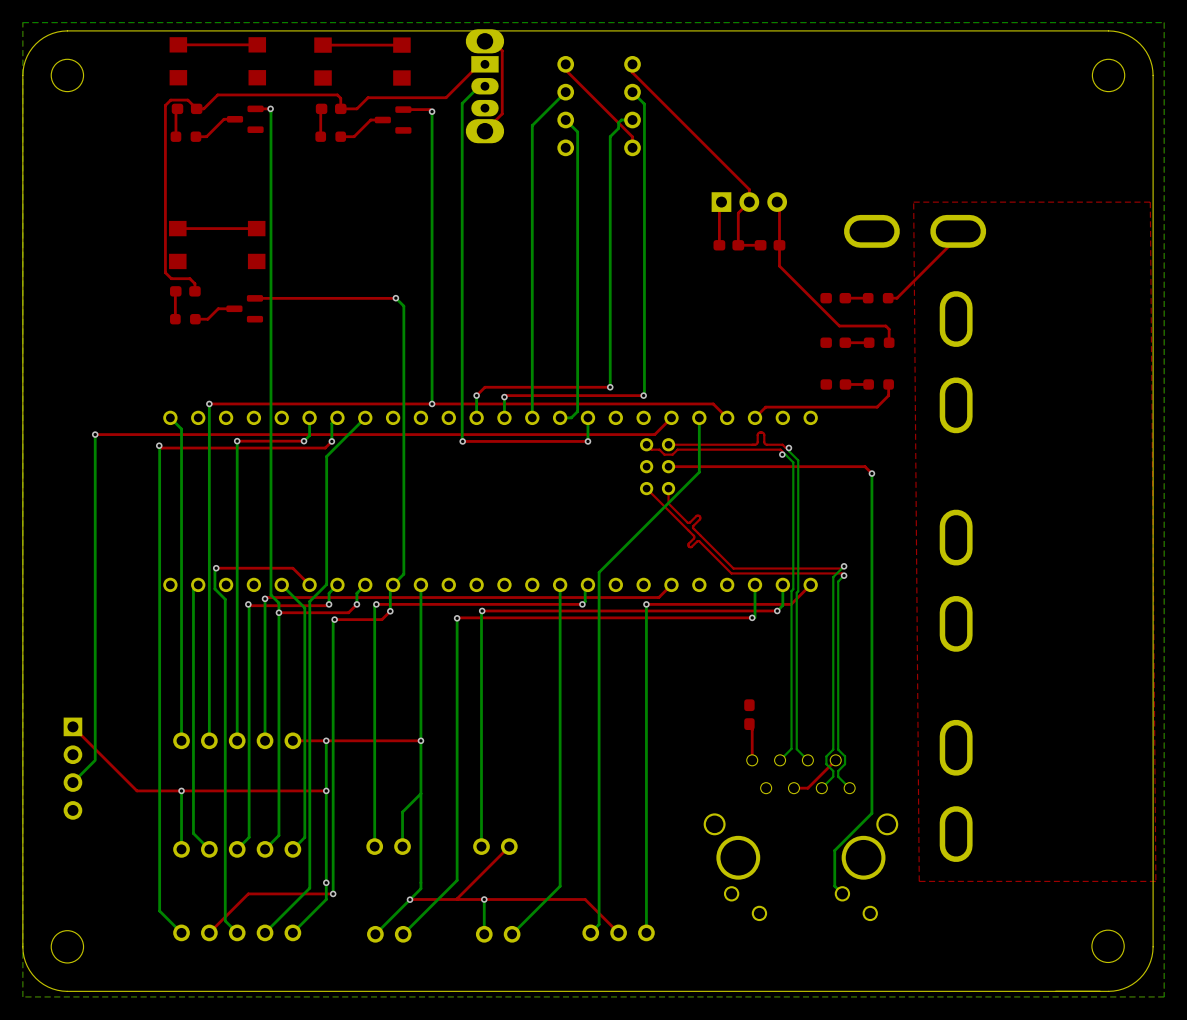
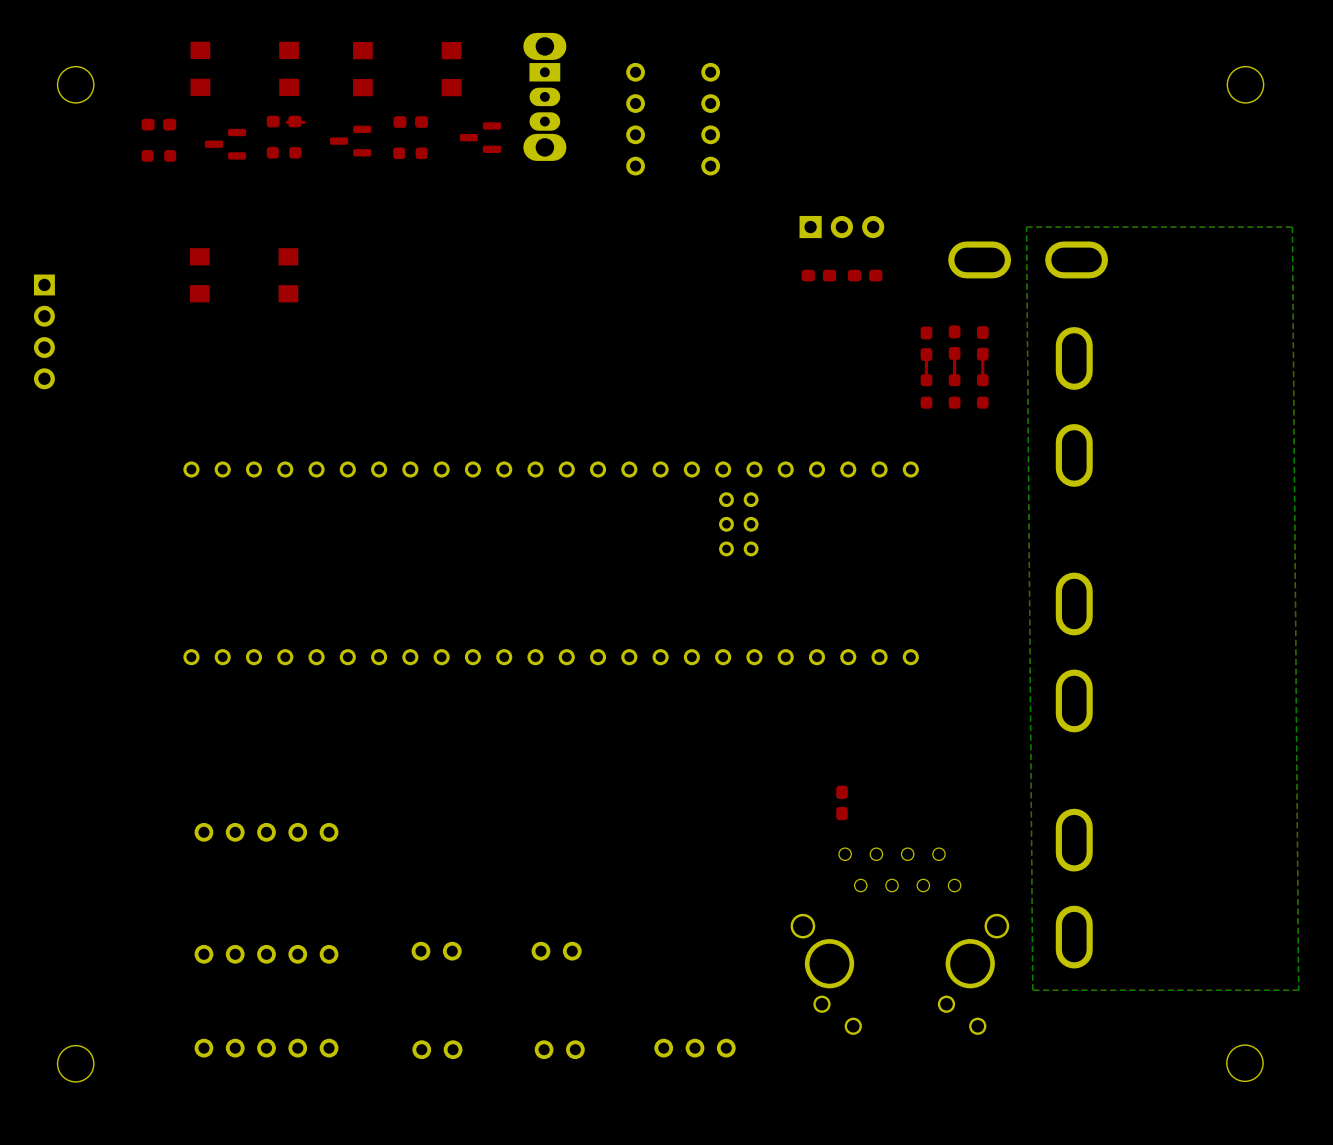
bottom zone outline: (1164, 22) (22, 22) (22, 996) (1164, 996) (1164, 22) -> none
board edge: (1108, 30) (67, 30) (52, 33) (39, 40) (27, 56) (22, 75) (22, 946) (25, 961) (32, 974) (48, 986) (67, 991) (1108, 991) (1123, 988) (1136, 981) (1148, 966) (1153, 946) (1153, 75) (1148, 56) (1140, 43) (1123, 33) (1108, 30) -> none
top track: (484, 41) (492, 41) (502, 50) (502, 113) (484, 131) -> none
top track: (257, 44) (178, 44) -> none
top track: (401, 45) (323, 45) -> none
top track: (484, 64) (479, 64) (446, 97) (368, 97) (356, 108) (340, 108) (340, 98) (337, 94) (217, 94) (203, 108) (196, 108) (187, 100) (170, 100) (165, 105) (165, 272) (171, 278) (189, 278) (194, 283) (194, 291) -> none
top track: (565, 64) (565, 70) (632, 136) (632, 147) -> none
top track: (632, 64) (632, 72) (749, 189) (749, 202) (738, 213) (738, 245) (760, 245) -> none
bottom track: (484, 86) (479, 86) (462, 103) (462, 441) -> none
bottom track: (565, 92) (532, 125) (532, 417) -> none
bottom track: (632, 92) (644, 104) (643, 395) -> none
top track: (177, 108) (175, 136) -> none
part: (187, 108) -> none
part: none -> (283, 121)
via: (270, 108) -> none
top track: (321, 108) (320, 136) -> none
part position: (331, 108) -> (410, 122)
top track: (403, 109) (430, 109) (432, 111) -> none
part: none -> (158, 124)
bottom track: (432, 111) (432, 403) -> none
via: (432, 111) -> none
bottom track: (270, 112) (270, 595) (278, 603) (278, 835) (265, 849) -> none
top track: (235, 119) (224, 119) (206, 136) (195, 136) -> none
part: (245, 119) -> none
top track: (382, 120) (370, 120) (354, 136) (340, 136) -> none
part position: (393, 120) -> (480, 137)
bottom track: (565, 120) (577, 131) (577, 411) (571, 417) (560, 417) -> none
bottom track: (632, 120) (621, 120) (618, 122) (618, 128) (610, 136) (610, 387) -> none
part: none -> (350, 141)
part: none -> (225, 144)
part: none -> (283, 152)
part: (185, 136) -> none
part position: (330, 136) -> (410, 153)
part: none -> (158, 155)
top track: (721, 202) (719, 204) (719, 245) -> none
top track: (777, 202) (779, 204) (779, 266) (839, 326) (885, 326) (889, 329) (889, 342) -> none
bottom zone outline: none -> (1292, 227) (1026, 227) (1032, 990) (1298, 990) (1292, 227)
top track: (256, 228) (177, 228) -> none
top track: (958, 231) (958, 236) (896, 298) (888, 298) -> none
top track: (175, 291) (175, 319) -> none
part: (185, 291) -> none
part footprint: [862, 292, 894, 304] -> [976, 326, 989, 361]
part: none -> (44, 331)
top track: (395, 298) (254, 298) -> none
bottom track: (395, 298) (403, 306) (403, 574) (390, 587) (390, 611) -> none
via: (395, 298) -> none
part: (835, 298) -> none
top track: (868, 298) (845, 298) -> none
part: none -> (954, 342)
part: none -> (926, 343)
top track: (234, 308) (218, 308) (207, 319) (195, 319) -> none
part: (244, 308) -> none
top track: none -> (954, 353) (954, 380)
top track: none -> (926, 354) (926, 380)
top track: none -> (982, 354) (982, 380)
part: (185, 319) -> none
part: (835, 342) -> none
top track: (869, 342) (845, 342) -> none
part rotation: 0° (879, 342) -> 90° clockwise (982, 391)
part: none -> (926, 391)
part: none -> (954, 391)
part: (835, 384) -> none
top track: (868, 384) (845, 384) -> none
part: (878, 384) -> none
top track: (888, 384) (888, 395) (877, 407) (765, 407) (755, 417) -> none
top track: (610, 387) (484, 387) (476, 395) -> none
via: (610, 387) -> none
bottom track: (476, 395) (476, 417) -> none
via: (476, 395) -> none
top track: (643, 395) (504, 397) -> none
via: (643, 395) -> none
bottom track: (504, 397) (504, 417) -> none
via: (504, 397) -> none
top track: (209, 403) (713, 403) (727, 417) -> none
bottom track: (209, 403) (209, 740) -> none
via: (209, 403) -> none
via: (432, 403) -> none
bottom track: (170, 417) (181, 429) (181, 740) -> none
bottom track: (309, 417) (309, 435) (304, 441) -> none
bottom track: (337, 417) (331, 423) (331, 441) -> none
bottom track: (365, 417) (326, 456) (326, 584) (309, 601) (309, 888) (265, 932) -> none
bottom track: (587, 417) (587, 441) -> none
top track: (671, 417) (654, 434) (95, 434) -> none
bottom track: (699, 417) (699, 472) (599, 572) (599, 924) (590, 932) -> none
via: (95, 434) -> none
bottom track: (95, 437) (95, 758) -> none
bottom track: (237, 441) (237, 740) -> none
via: (237, 441) -> none
top track: (304, 441) (237, 441) -> none
via: (304, 441) -> none
top track: (331, 441) (325, 448) (161, 448) (159, 445) -> none
via: (331, 441) -> none
via: (462, 441) -> none
top track: (587, 441) (462, 441) -> none
via: (587, 441) -> none
top track: (646, 444) (651, 449) (659, 449) (664, 454) (672, 454) (677, 449) (780, 449) (782, 454) -> none
top track: (668, 444) (755, 444) (757, 442) (757, 433) (761, 432) (764, 434) (765, 444) (782, 444) (788, 447) -> none
bottom track: (159, 445) (159, 911) (181, 932) -> none
via: (159, 445) -> none
bottom track: (788, 447) (788, 451) (798, 460) (796, 749) (807, 760) -> none
via: (788, 447) -> none
bottom track: (782, 454) (785, 454) (793, 462) (793, 589) (791, 591) (791, 748) (780, 760) -> none
via: (782, 454) -> none
top track: (668, 466) (865, 466) (871, 473) -> none
bottom track: (871, 473) (871, 813) (834, 850) (834, 886) (842, 893) -> none
via: (871, 473) -> none
top track: (646, 488) (694, 536) (688, 544) (689, 546) (699, 541) (731, 573) (841, 573) (844, 575) -> none
top track: (668, 488) (668, 503) (688, 522) (696, 515) (699, 516) (693, 528) (733, 568) (841, 568) (844, 566) -> none
bottom track: (844, 566) (833, 577) (833, 749) (826, 756) (826, 764) (833, 771) (833, 776) (821, 788) -> none
via: (844, 566) -> none
top track: (216, 568) (292, 568) (309, 584) -> none
bottom track: (216, 568) (214, 588) (225, 599) (225, 920) (237, 932) -> none
via: (216, 568) -> none
bottom track: (844, 575) (838, 581) (838, 749) (845, 756) (845, 764) (838, 771) (838, 776) (849, 788) -> none
via: (844, 575) -> none
bottom track: (198, 584) (193, 589) (193, 833) (209, 849) -> none
bottom track: (281, 584) (304, 607) (304, 837) (292, 849) -> none
bottom track: (337, 584) (329, 593) (329, 604) -> none
bottom track: (365, 584) (356, 593) (356, 604) -> none
bottom track: (420, 584) (420, 888) (375, 934) -> none
bottom track: (560, 584) (560, 886) (512, 934) -> none
bottom track: (587, 584) (585, 587) (585, 601) (582, 604) -> none
top track: (671, 584) (658, 597) (265, 598) -> none
bottom track: (755, 584) (755, 617) -> none
bottom track: (782, 584) (782, 605) (777, 610) -> none
top track: (810, 584) (791, 604) (646, 604) -> none
bottom track: (265, 598) (265, 740) -> none
via: (265, 598) -> none
bottom track: (248, 604) (249, 837) (237, 849) -> none
via: (248, 604) -> none
top track: (329, 604) (248, 604) -> none
via: (329, 604) -> none
top track: (356, 604) (348, 612) (278, 612) -> none
via: (356, 604) -> none
bottom track: (376, 604) (374, 606) (374, 846) -> none
via: (376, 604) -> none
top track: (582, 604) (376, 604) -> none
via: (582, 604) -> none
bottom track: (646, 604) (646, 932) -> none
via: (646, 604) -> none
bottom track: (482, 610) (481, 846) -> none
via: (482, 610) -> none
top track: (777, 610) (482, 610) -> none
via: (777, 610) -> none
top track: (390, 611) (381, 619) (334, 619) -> none
via: (390, 611) -> none
via: (278, 612) -> none
top track: (752, 617) (457, 618) -> none
via: (752, 617) -> none
bottom track: (457, 618) (457, 880) (403, 934) -> none
via: (457, 618) -> none
bottom track: (334, 619) (333, 893) -> none
via: (334, 619) -> none
top track: (749, 724) (752, 729) (752, 760) -> none
top track: (72, 726) (136, 790) (326, 790) -> none
bottom track: (326, 740) (326, 899) (292, 932) -> none
via: (326, 740) -> none
top track: (420, 740) (292, 740) -> none
via: (420, 740) -> none
bottom track: (95, 760) (72, 782) -> none
top track: (835, 760) (807, 788) (793, 788) -> none
part: (72, 768) -> none
bottom track: (181, 790) (181, 849) -> none
via: (181, 790) -> none
via: (326, 790) -> none
bottom track: (420, 793) (402, 812) (402, 846) -> none
top track: (509, 846) (457, 899) -> none
via: (326, 882) -> none
top track: (333, 893) (248, 893) (209, 932) -> none
via: (333, 893) -> none
top track: (409, 899) (585, 899) (618, 932) -> none
via: (409, 899) -> none
bottom track: (484, 899) (484, 934) -> none
via: (484, 899) -> none

